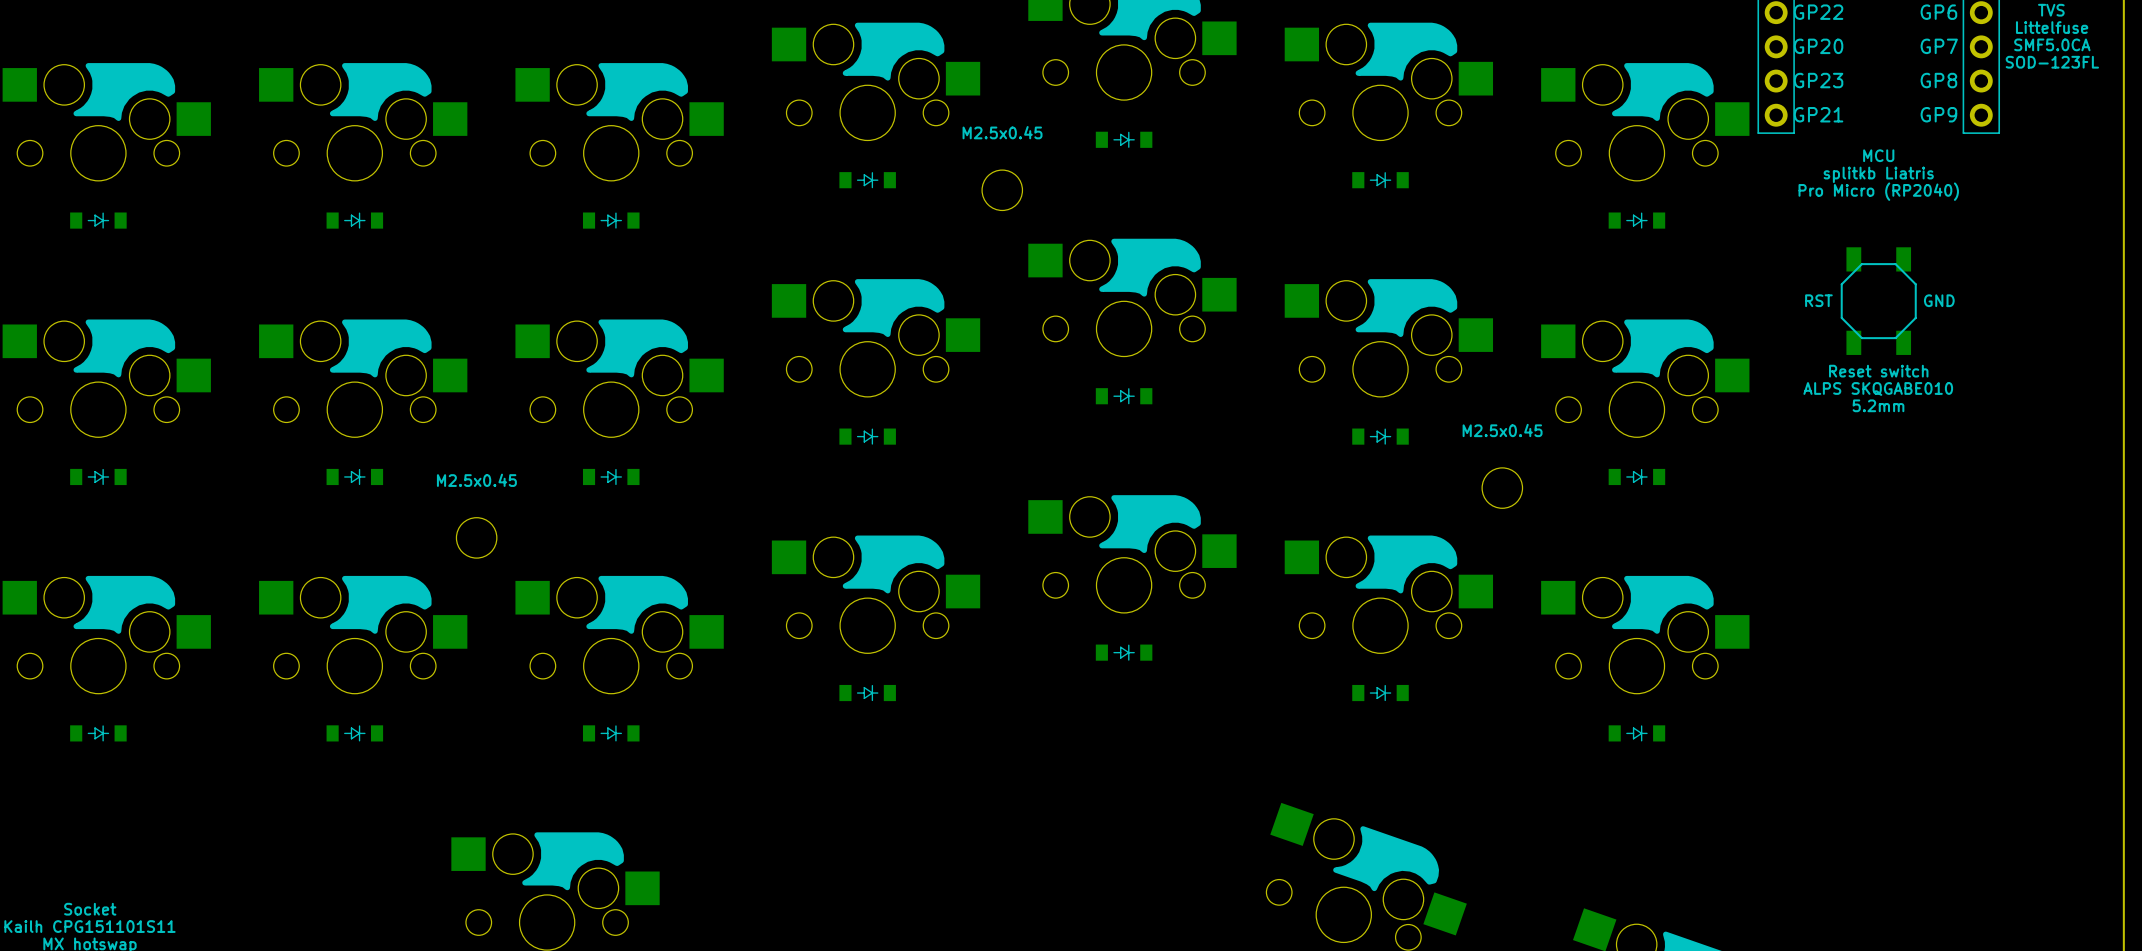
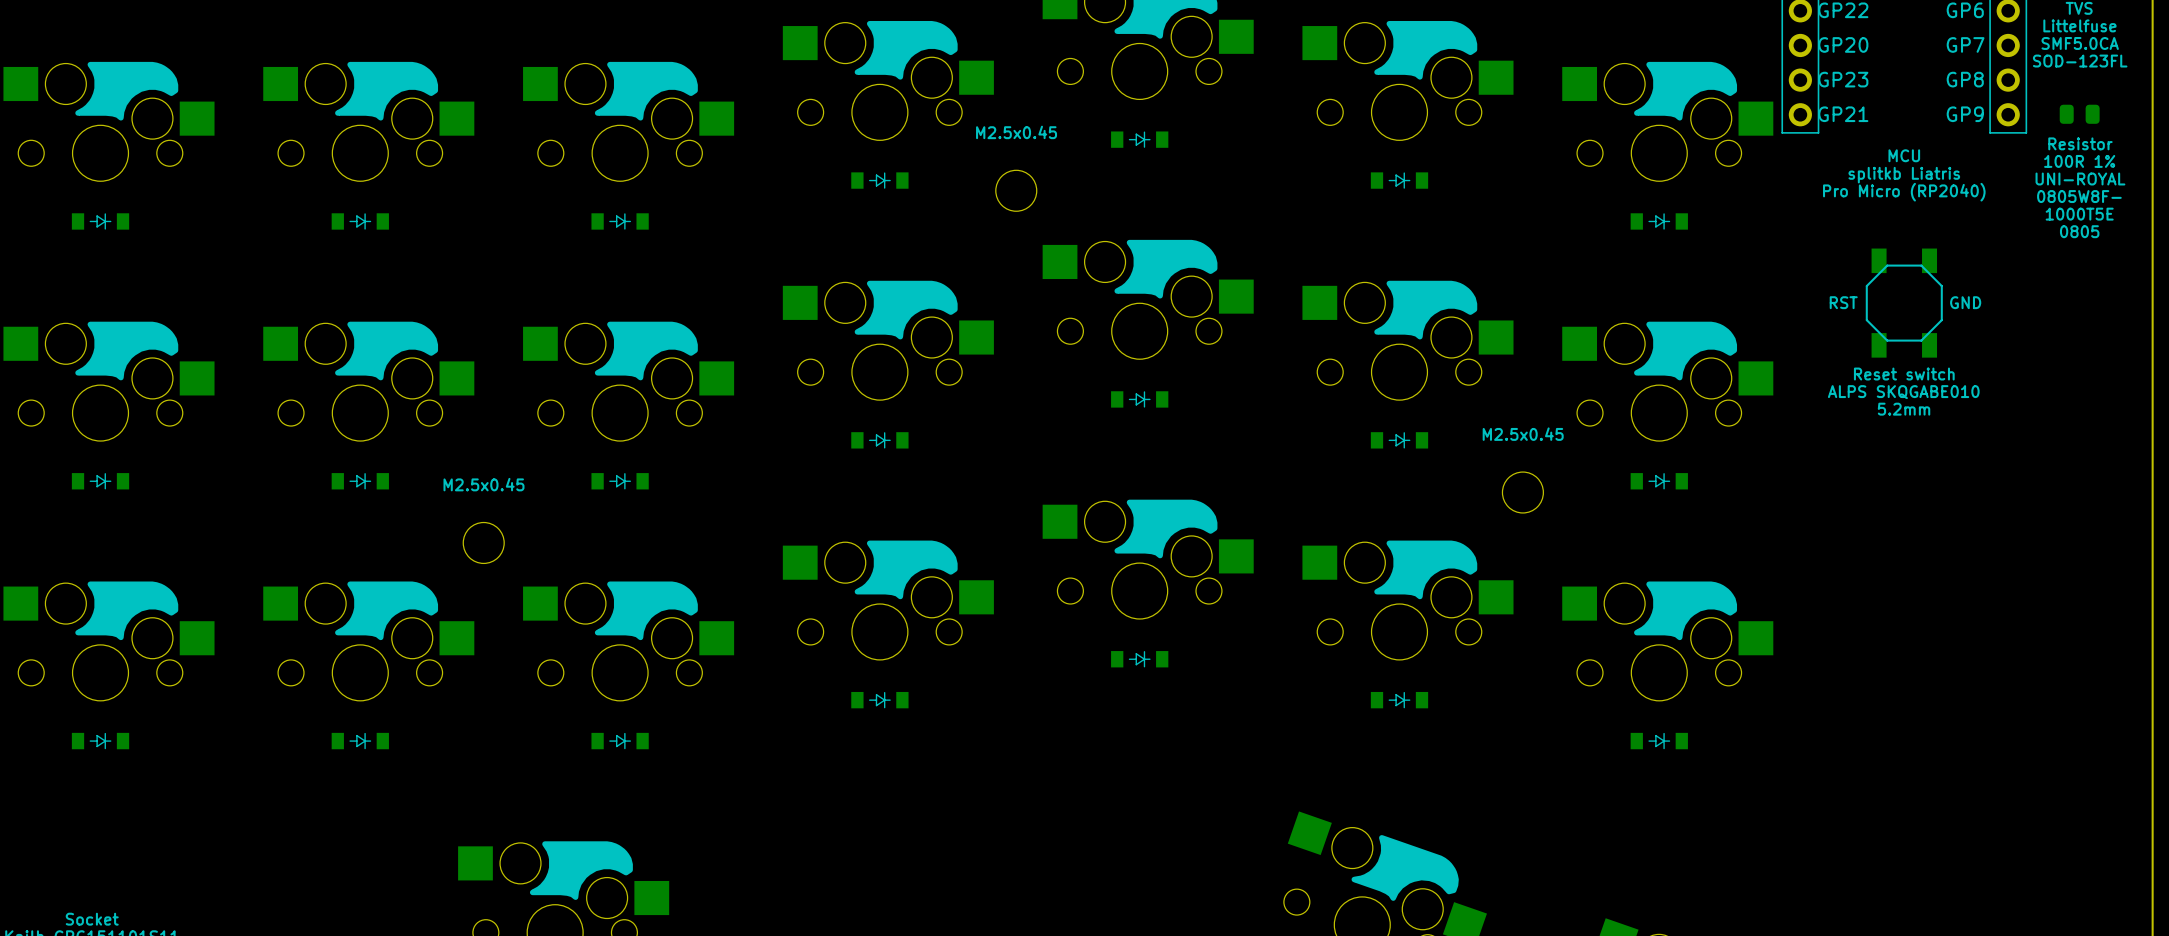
part: none -> (2079, 114)
text: none -> Resistor (2080, 143)
text: none -> 100R 1% (2079, 161)
text: none -> UNI-ROYAL (2080, 179)
text: none -> 0805W8F- (2079, 196)
text: none -> 1000T5E (2079, 214)
text: none -> 0805 (2079, 231)

